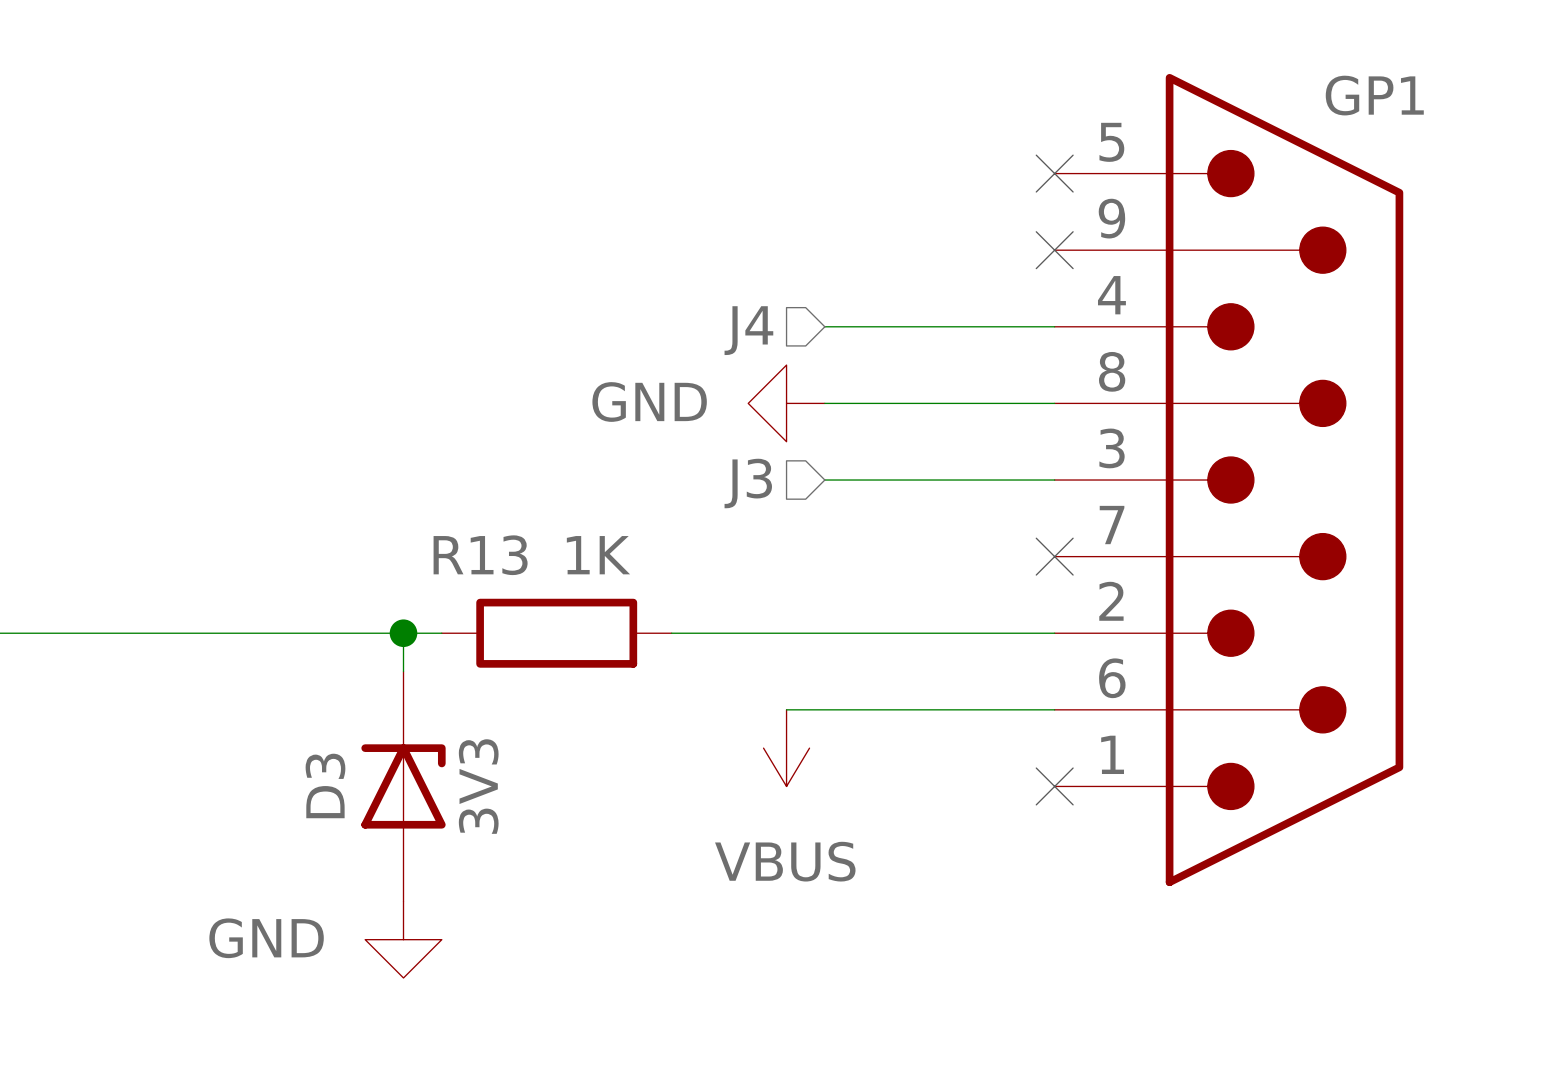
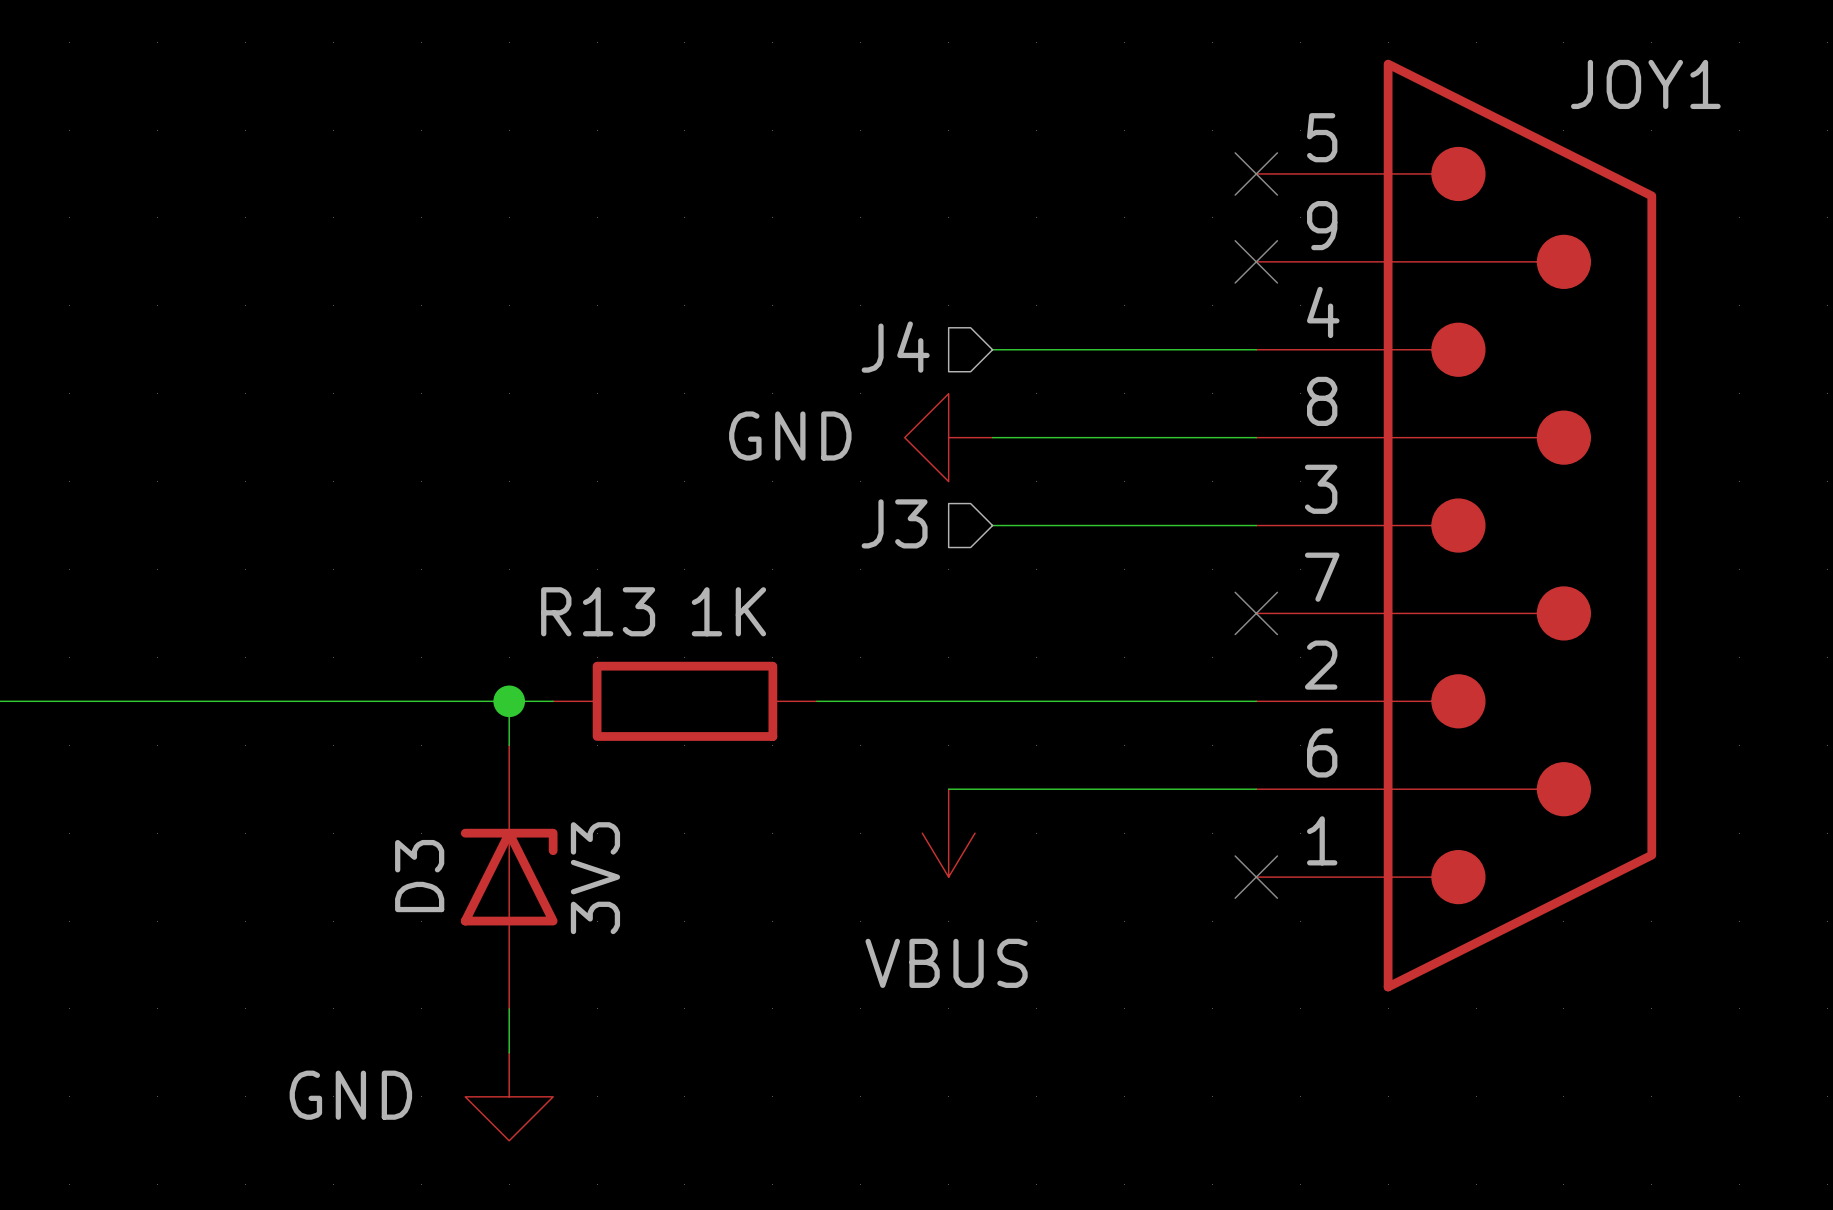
GP1 name: GP1 (1374, 95) -> JOY1 (1645, 84)
power symbol position: GND (403, 939) -> GND (509, 1096)

